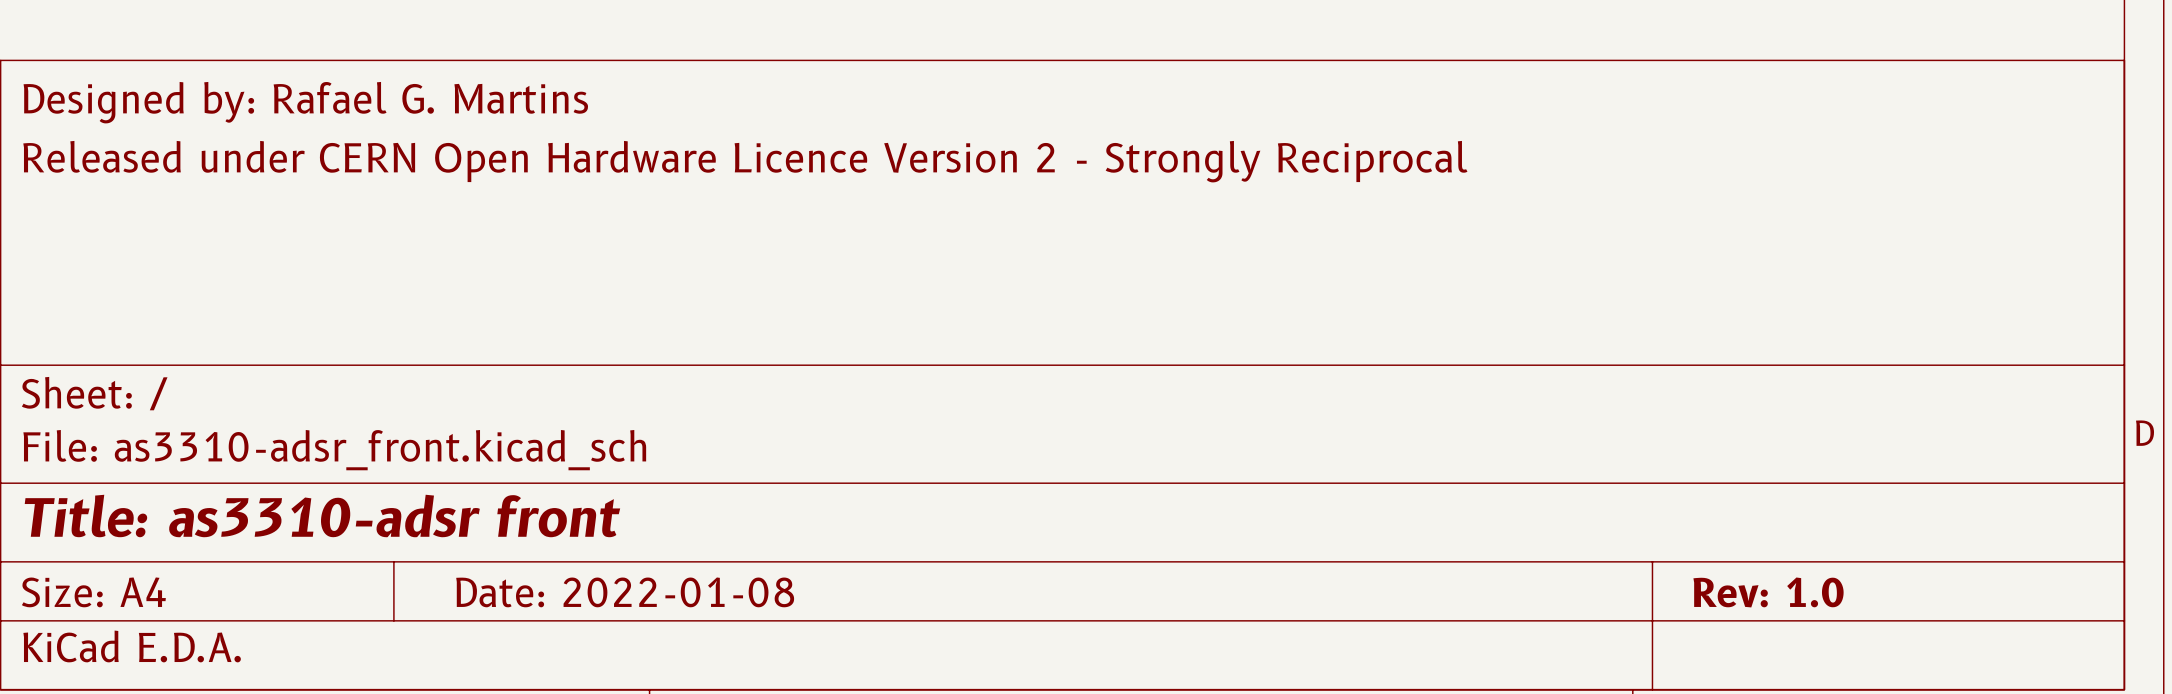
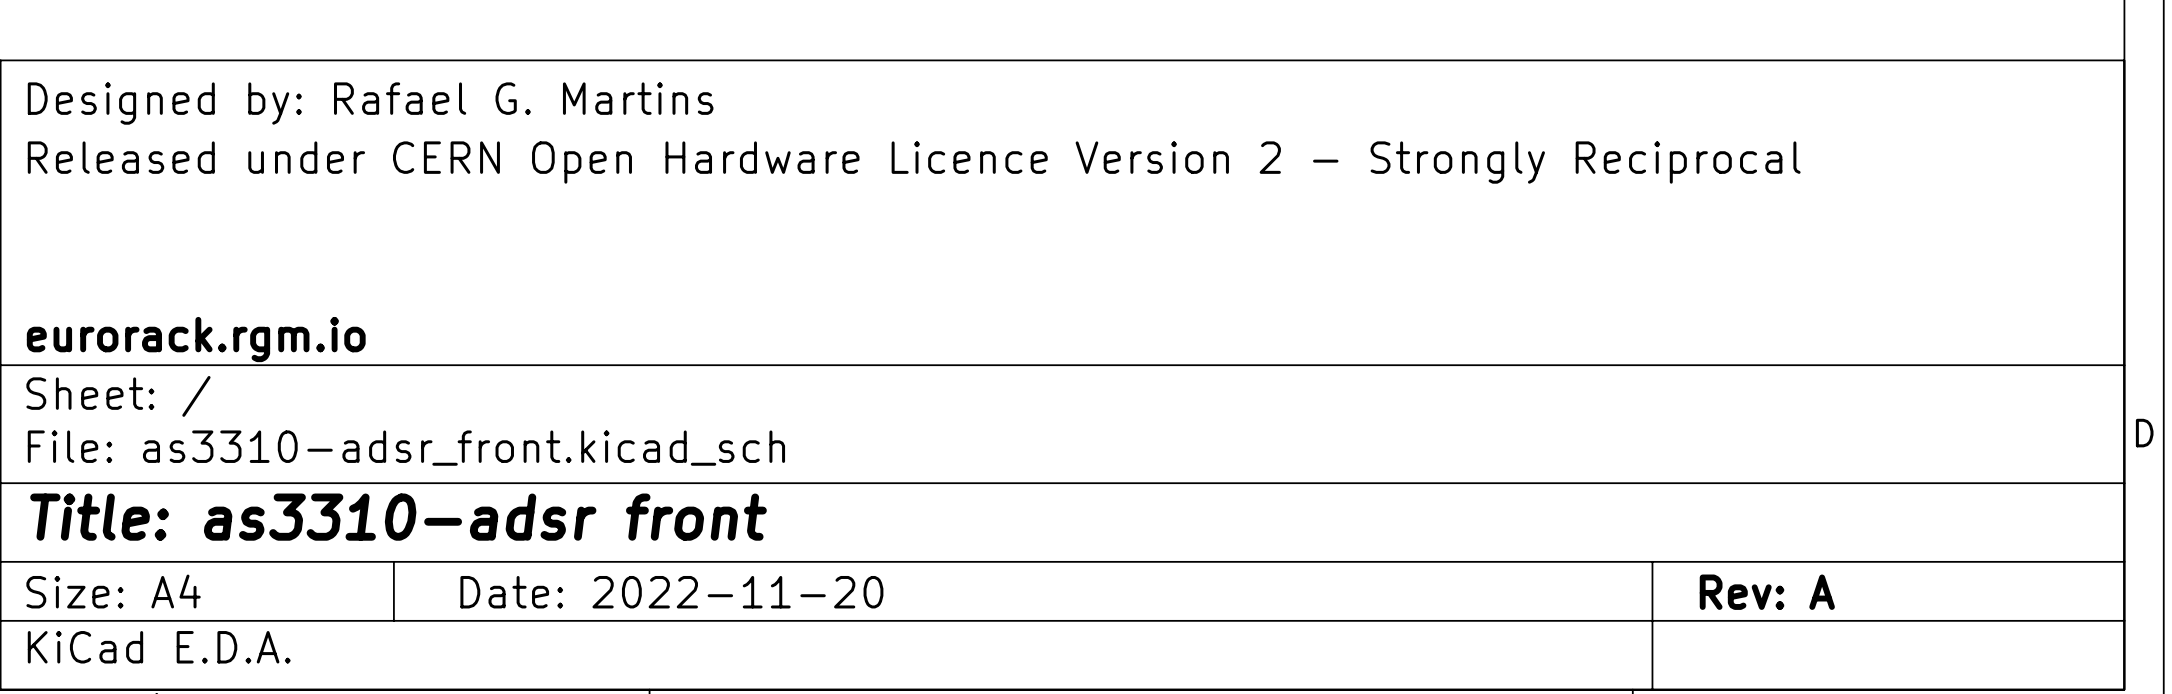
title block: none -> eurorack.rgm.io (196, 339)
title block: Date: 2022-01-08 (625, 592) -> Date: 2022-11-20 (671, 592)
title block: Rev: 1.0 (1768, 592) -> Rev: A (1767, 592)

